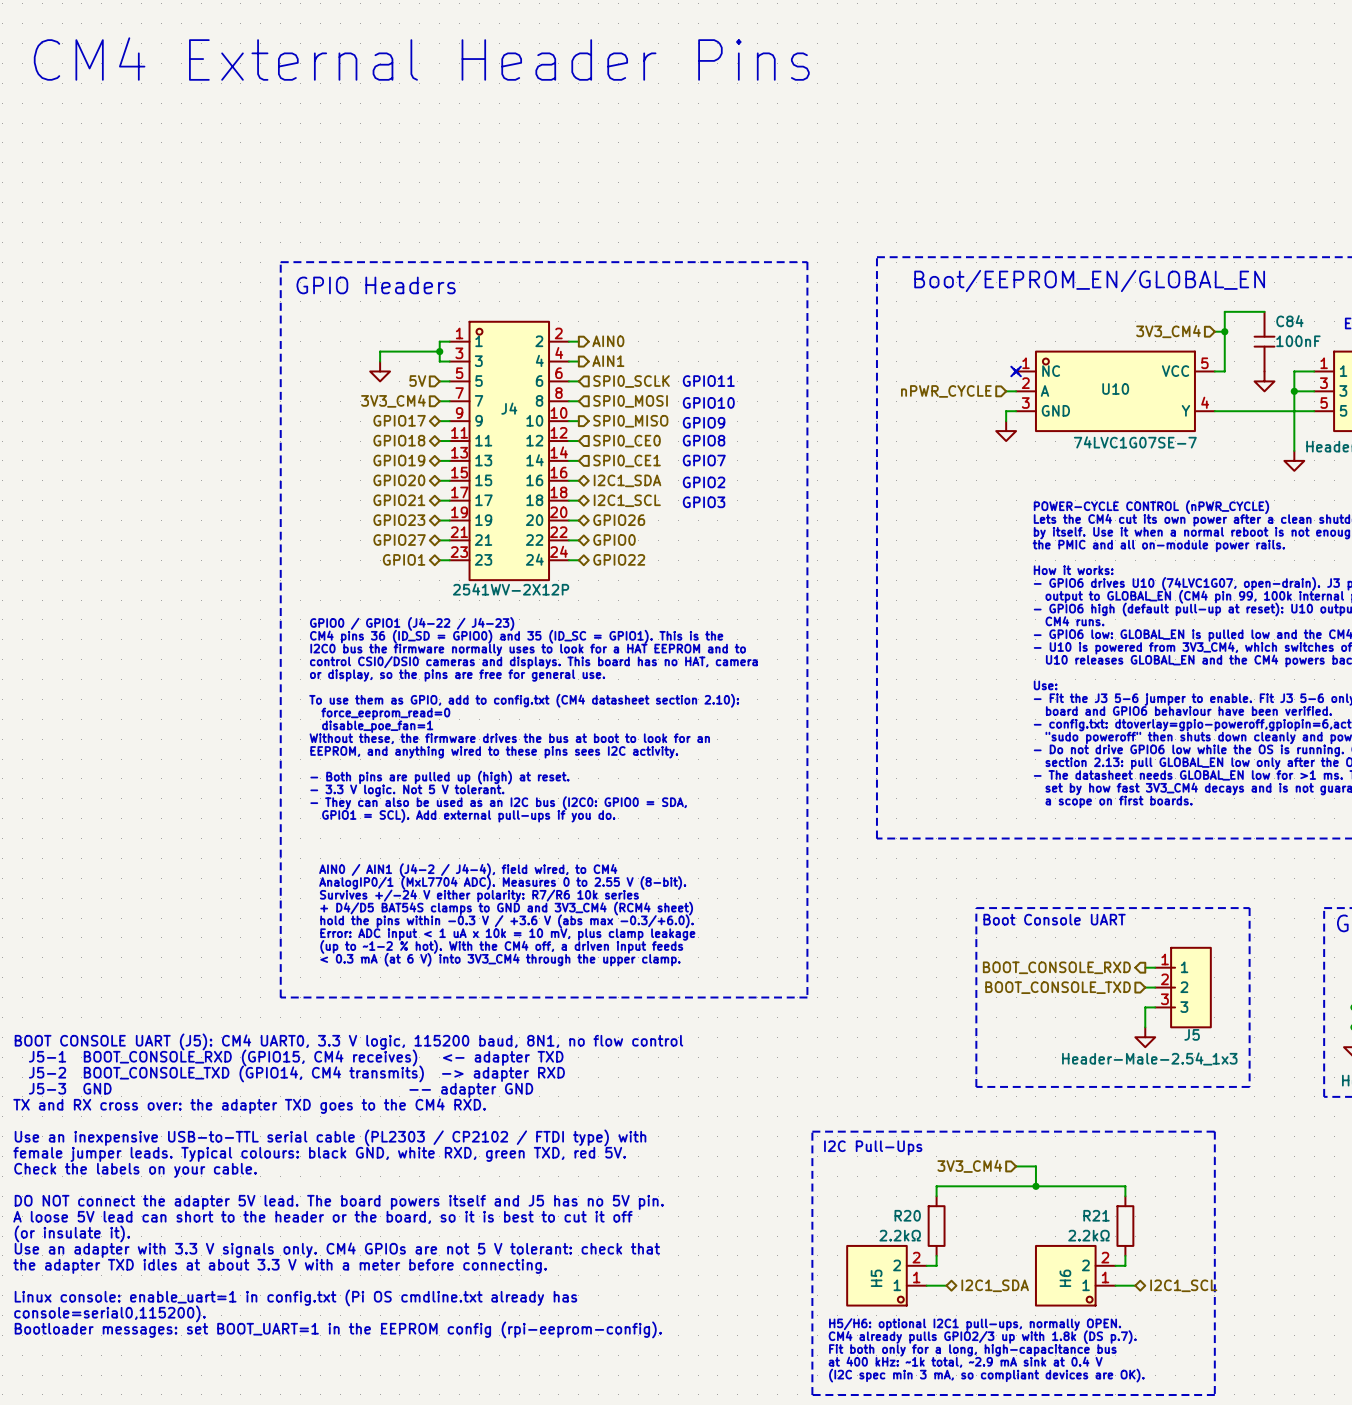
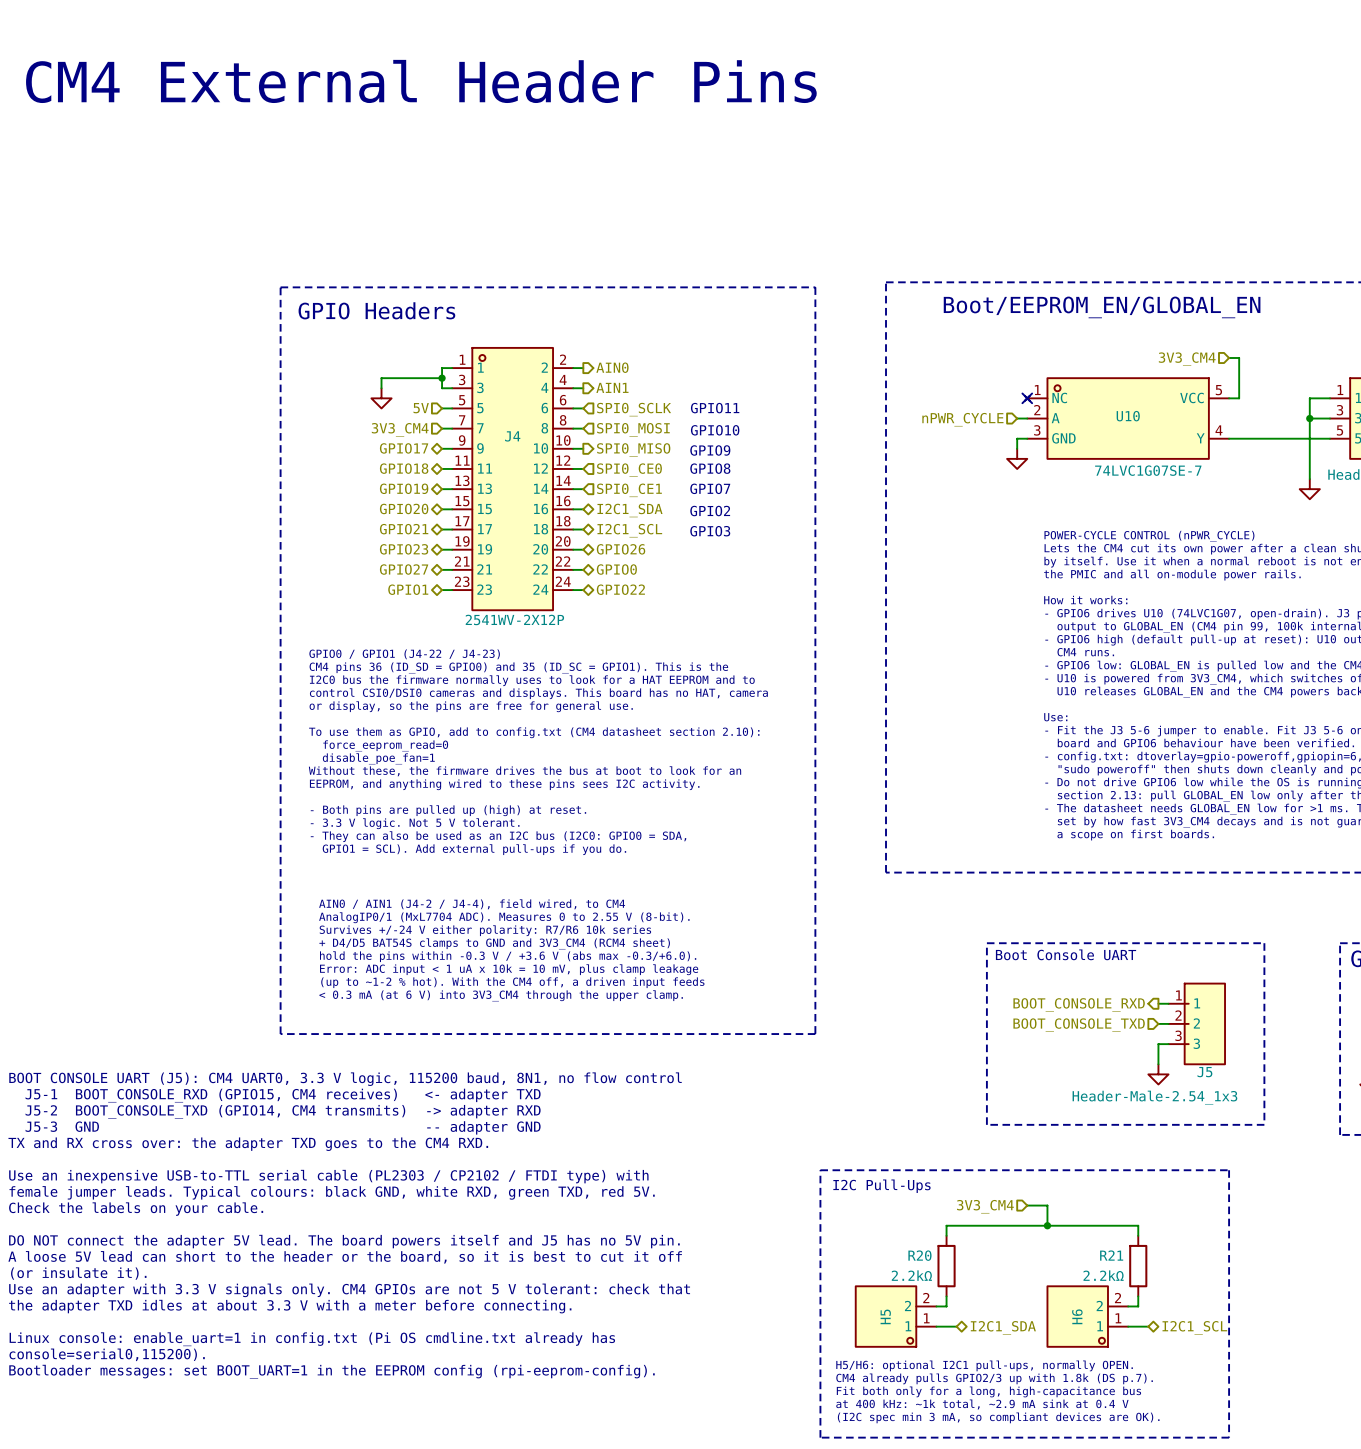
wire: (1264, 311) (1224, 311) (1224, 331) -> none
junction: (1224, 331) -> none
C84: 100nF (1264, 341) -> none
power symbol: (1264, 381) -> none

